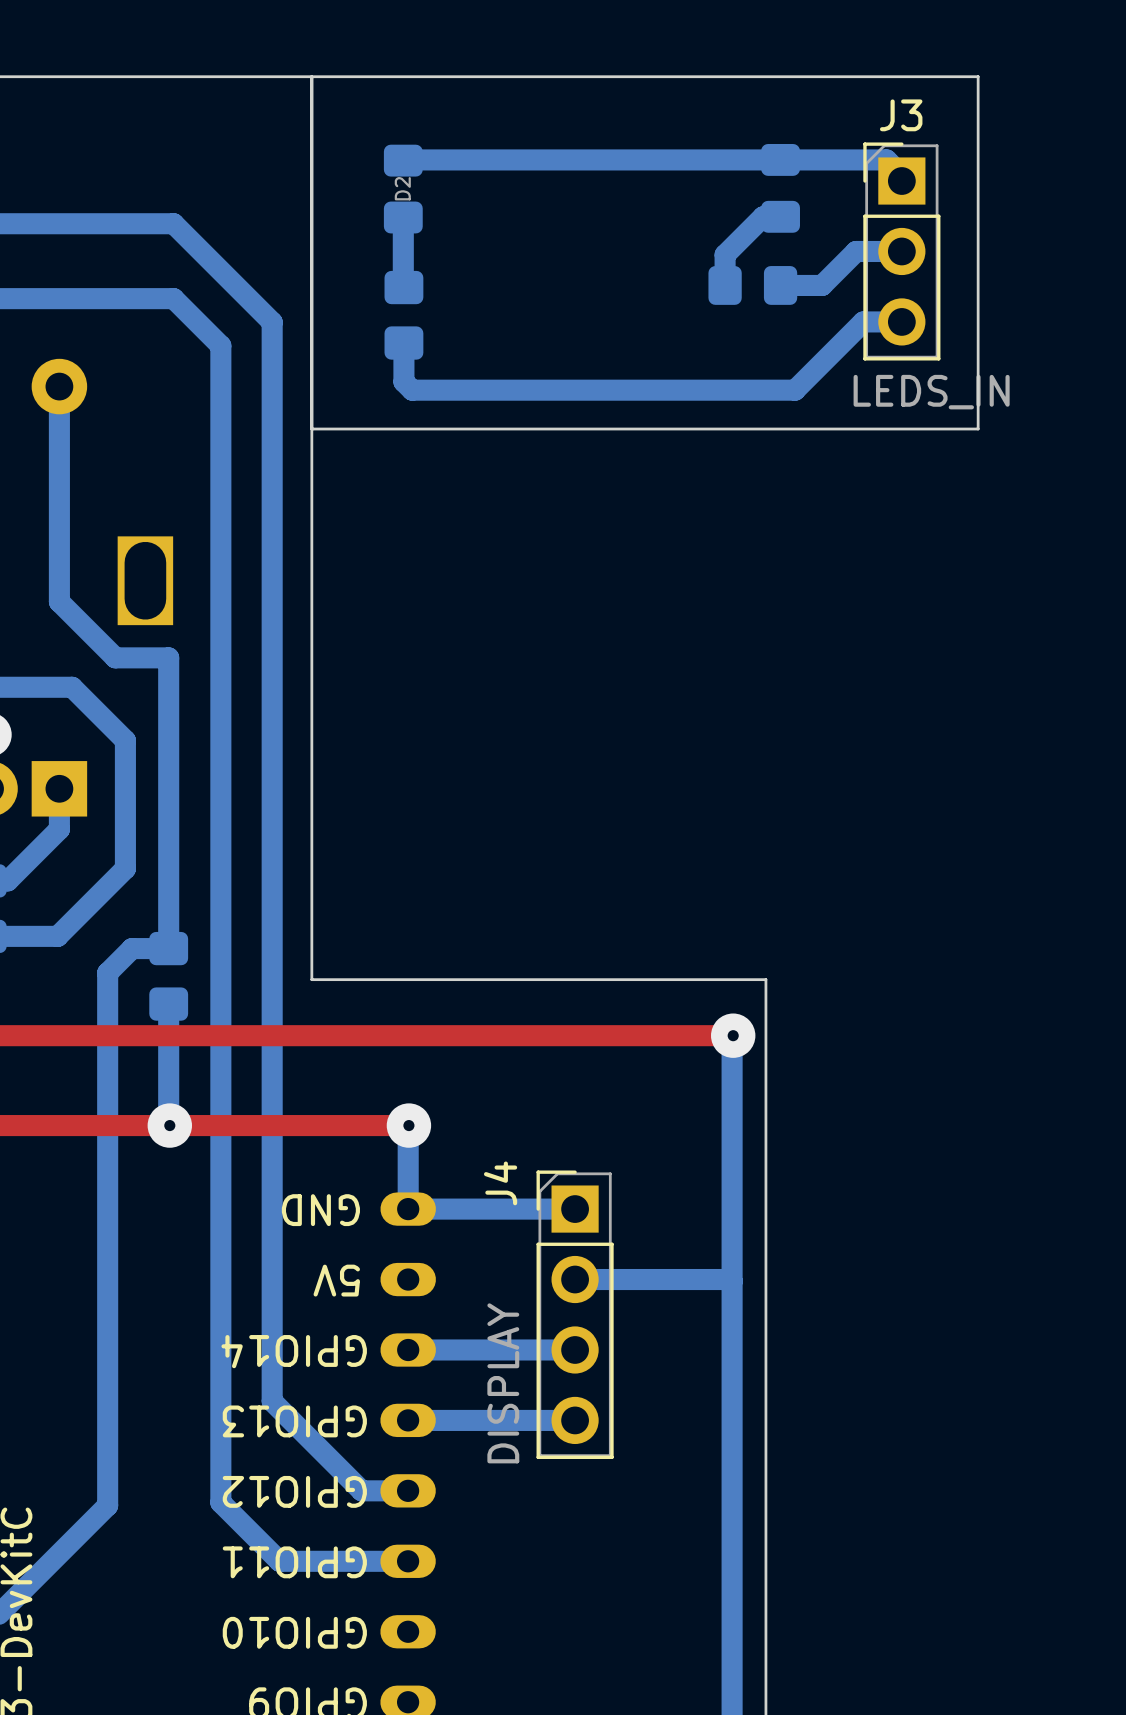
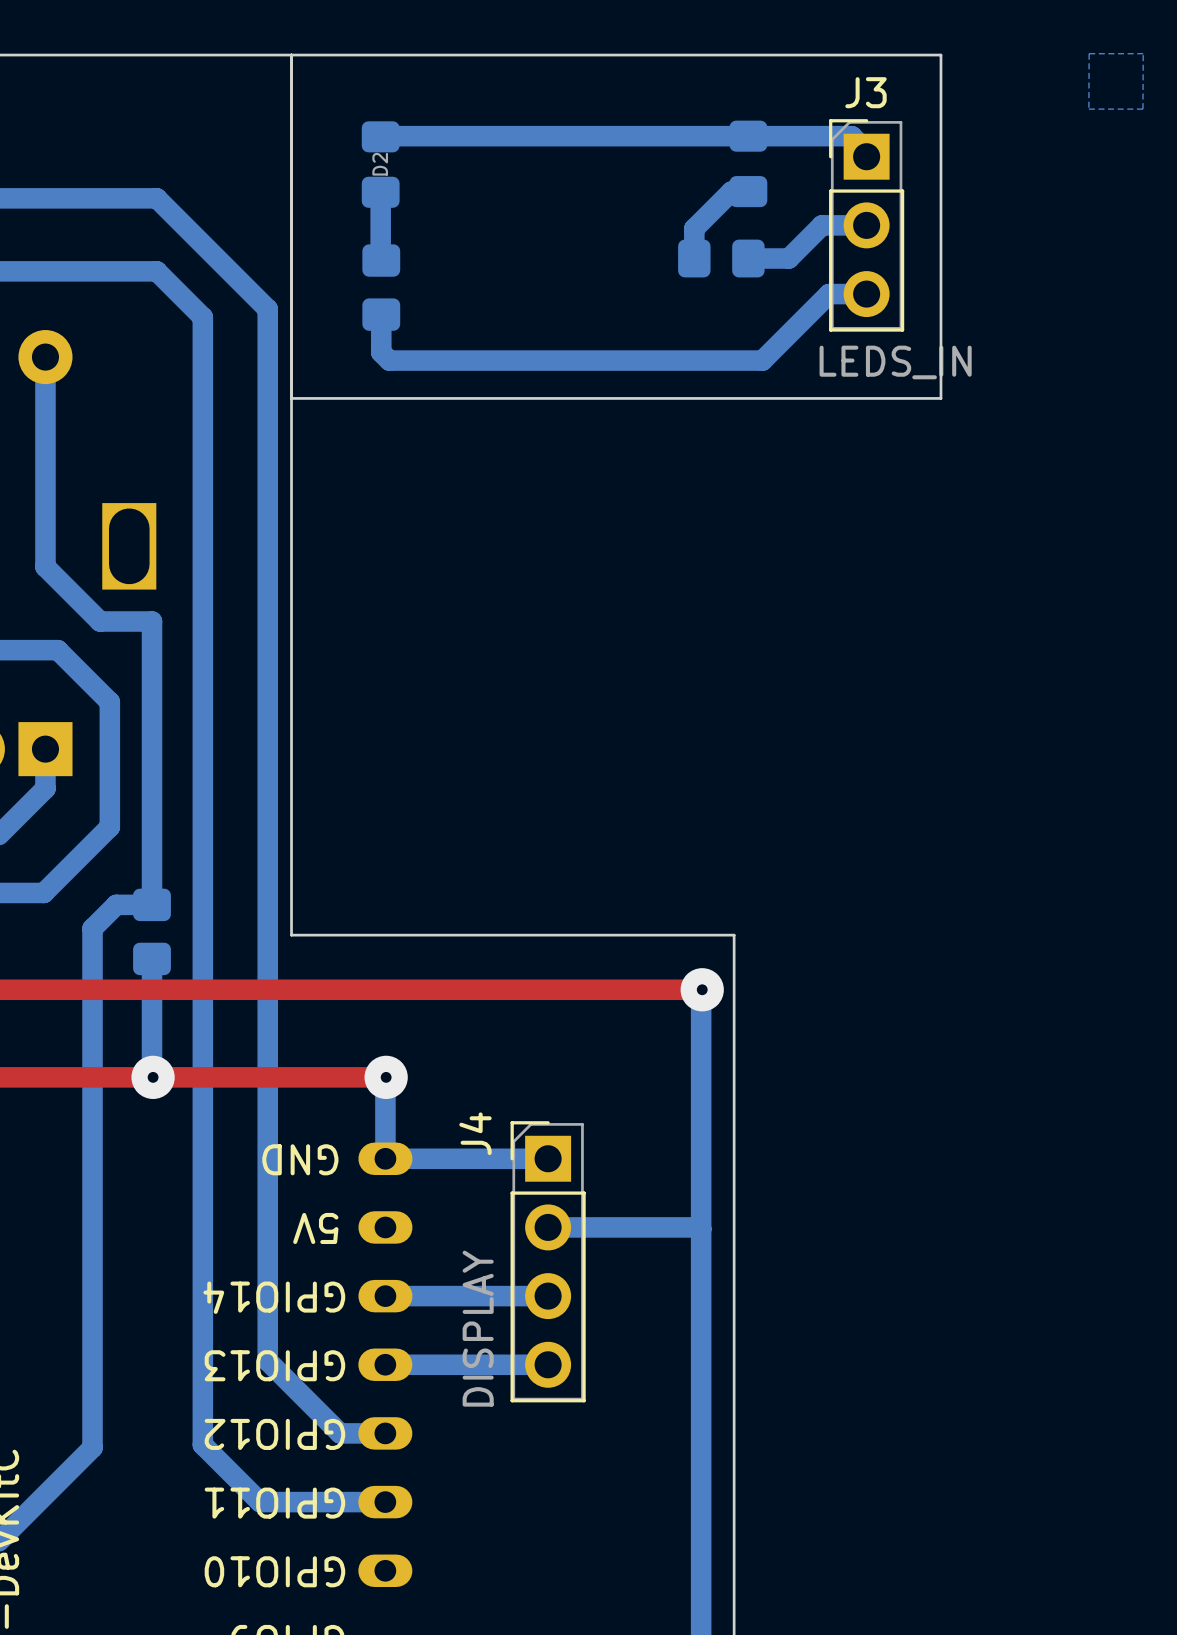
bottom track: (272, 322) (272, 1401) (287, 1416) -> (252, 294) (267, 309) (267, 1361)

